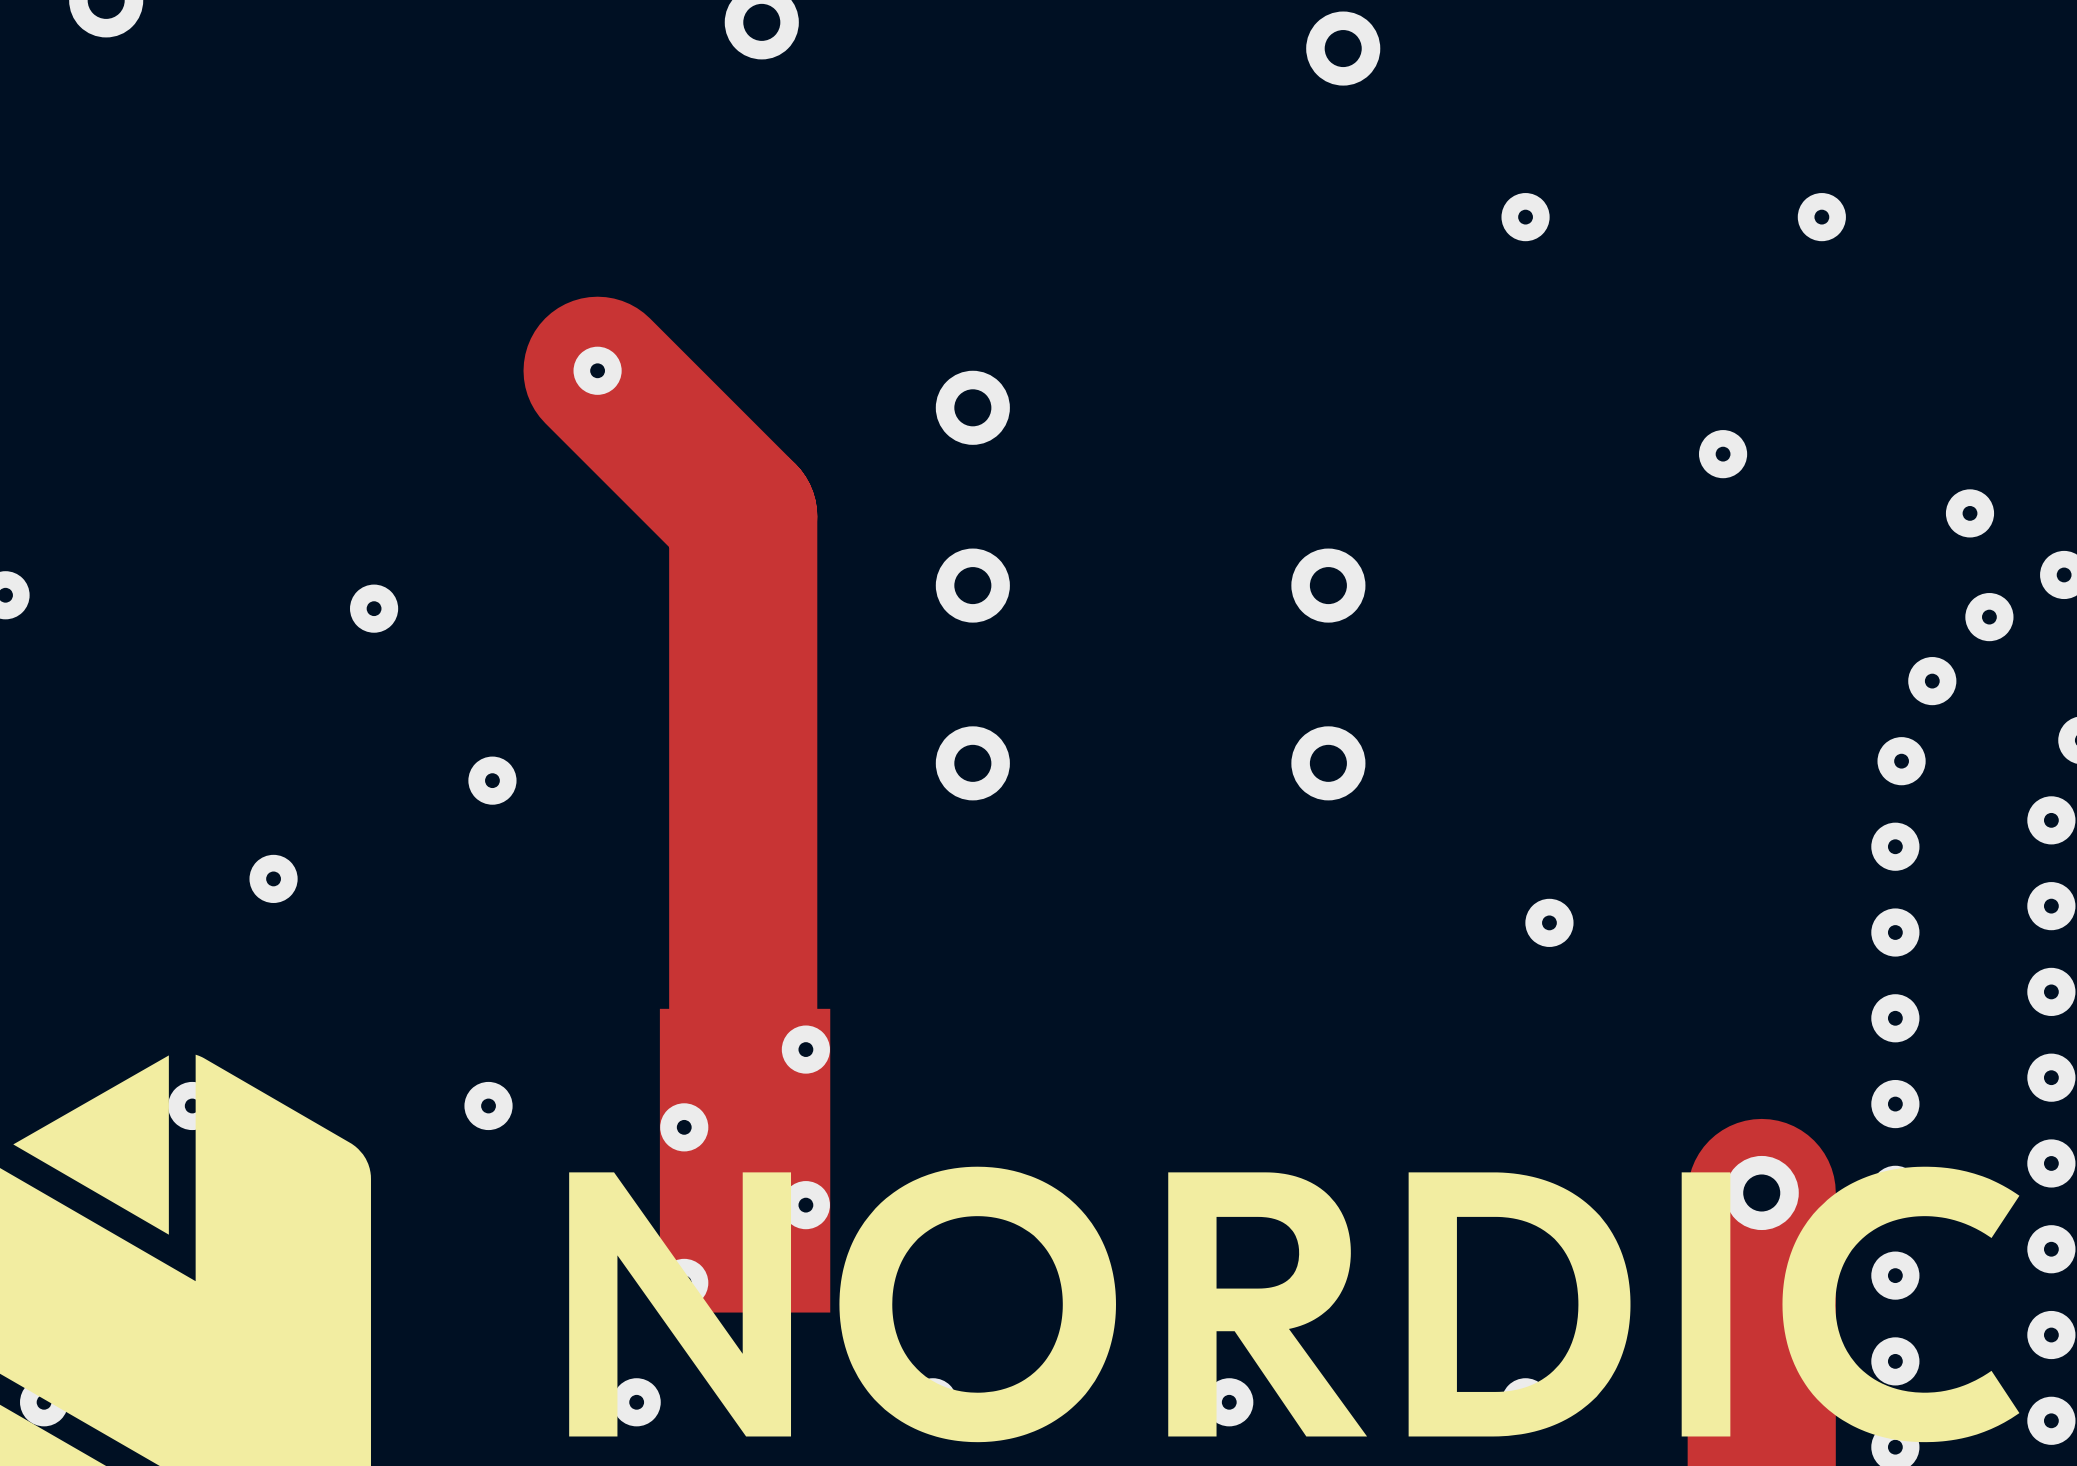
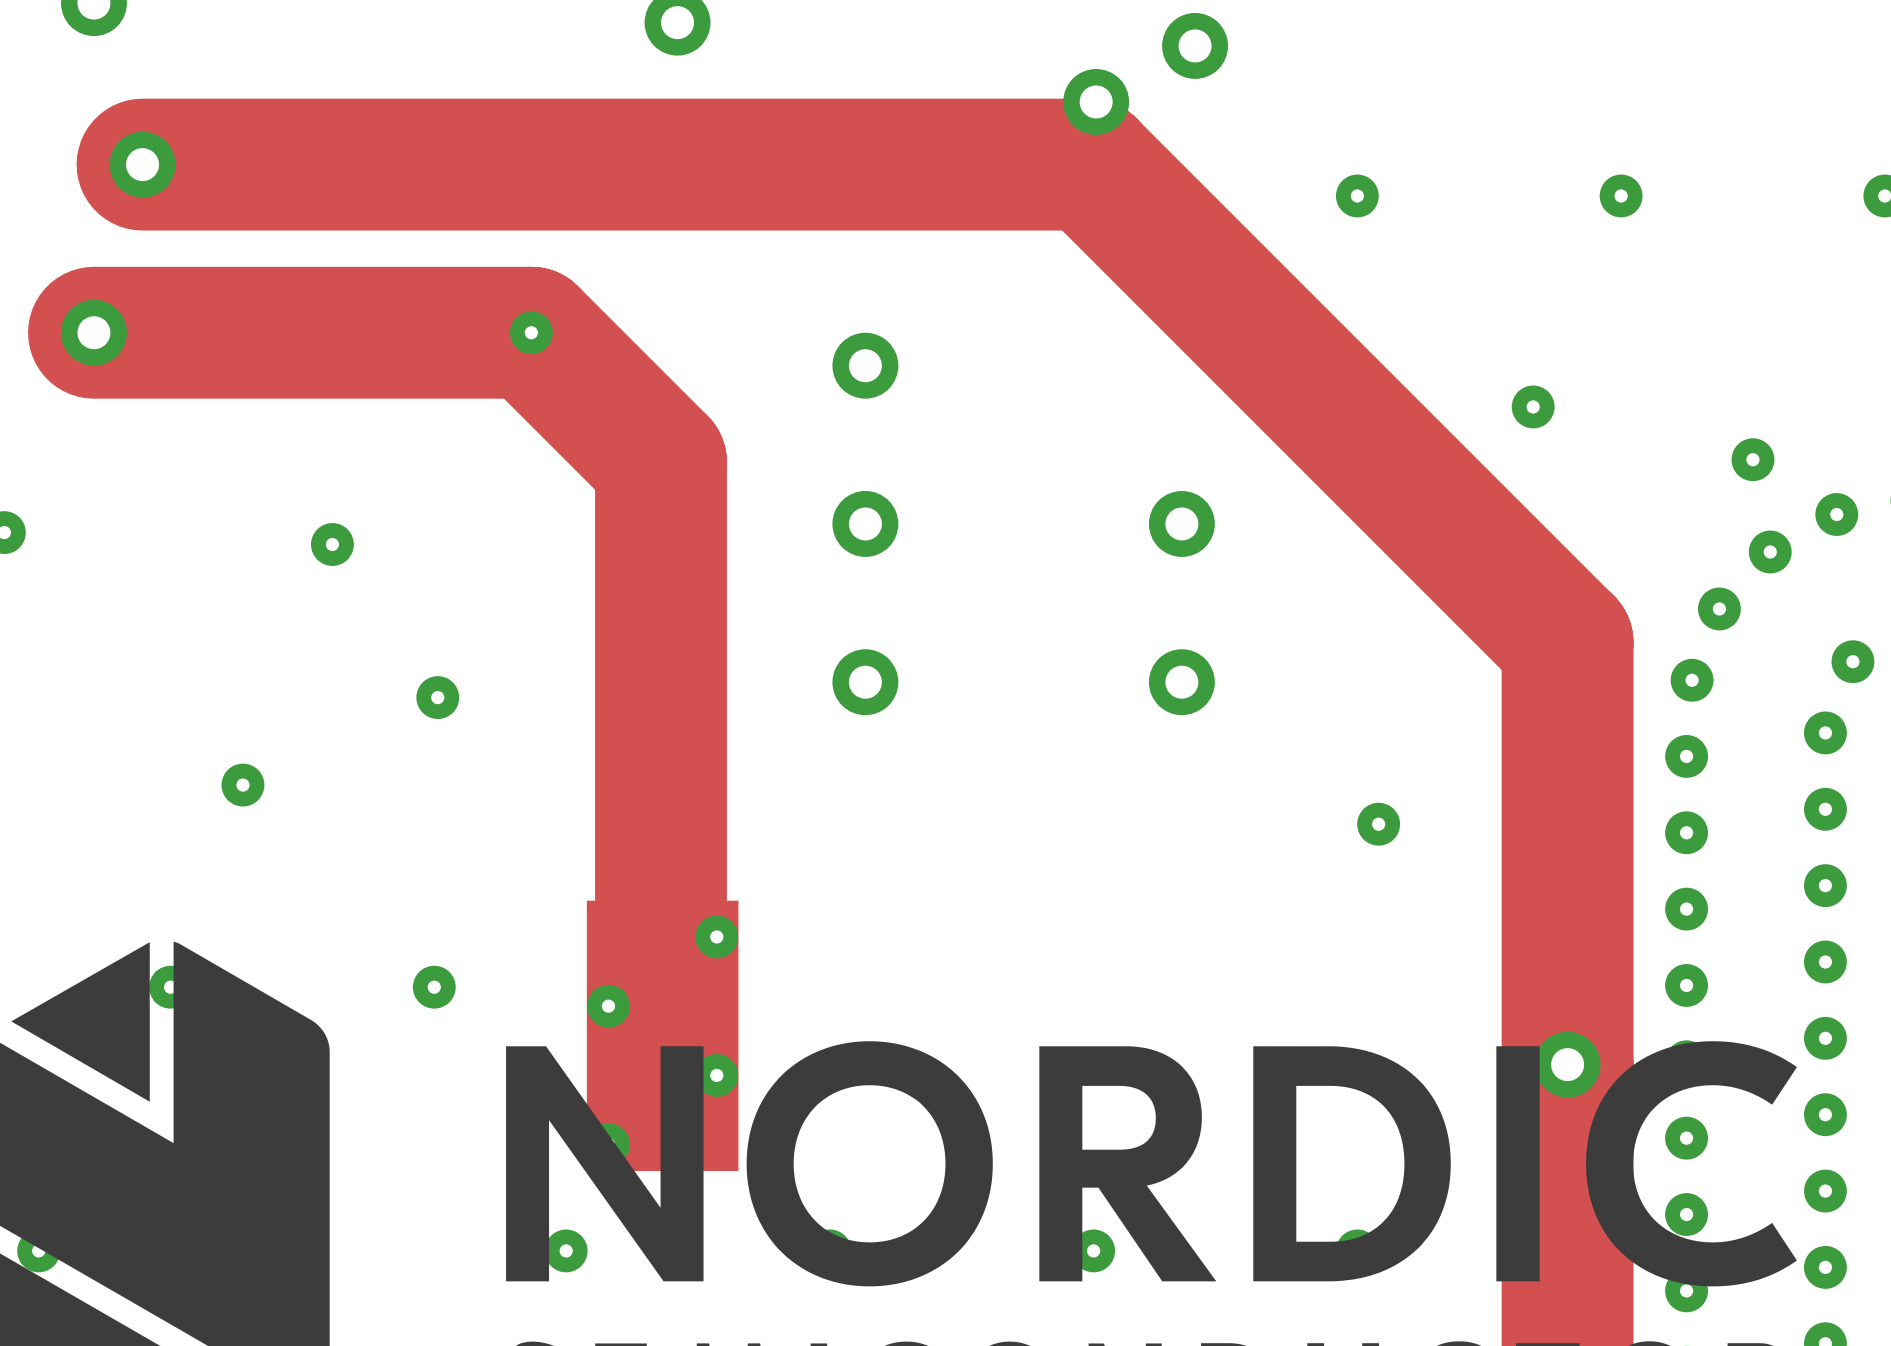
via: none -> (1096, 101)
track: none -> (142, 164) (1089, 164) (1567, 642) (1567, 1064)
via: none -> (142, 164)
track: none -> (93, 332) (531, 332)
via: none -> (93, 332)

